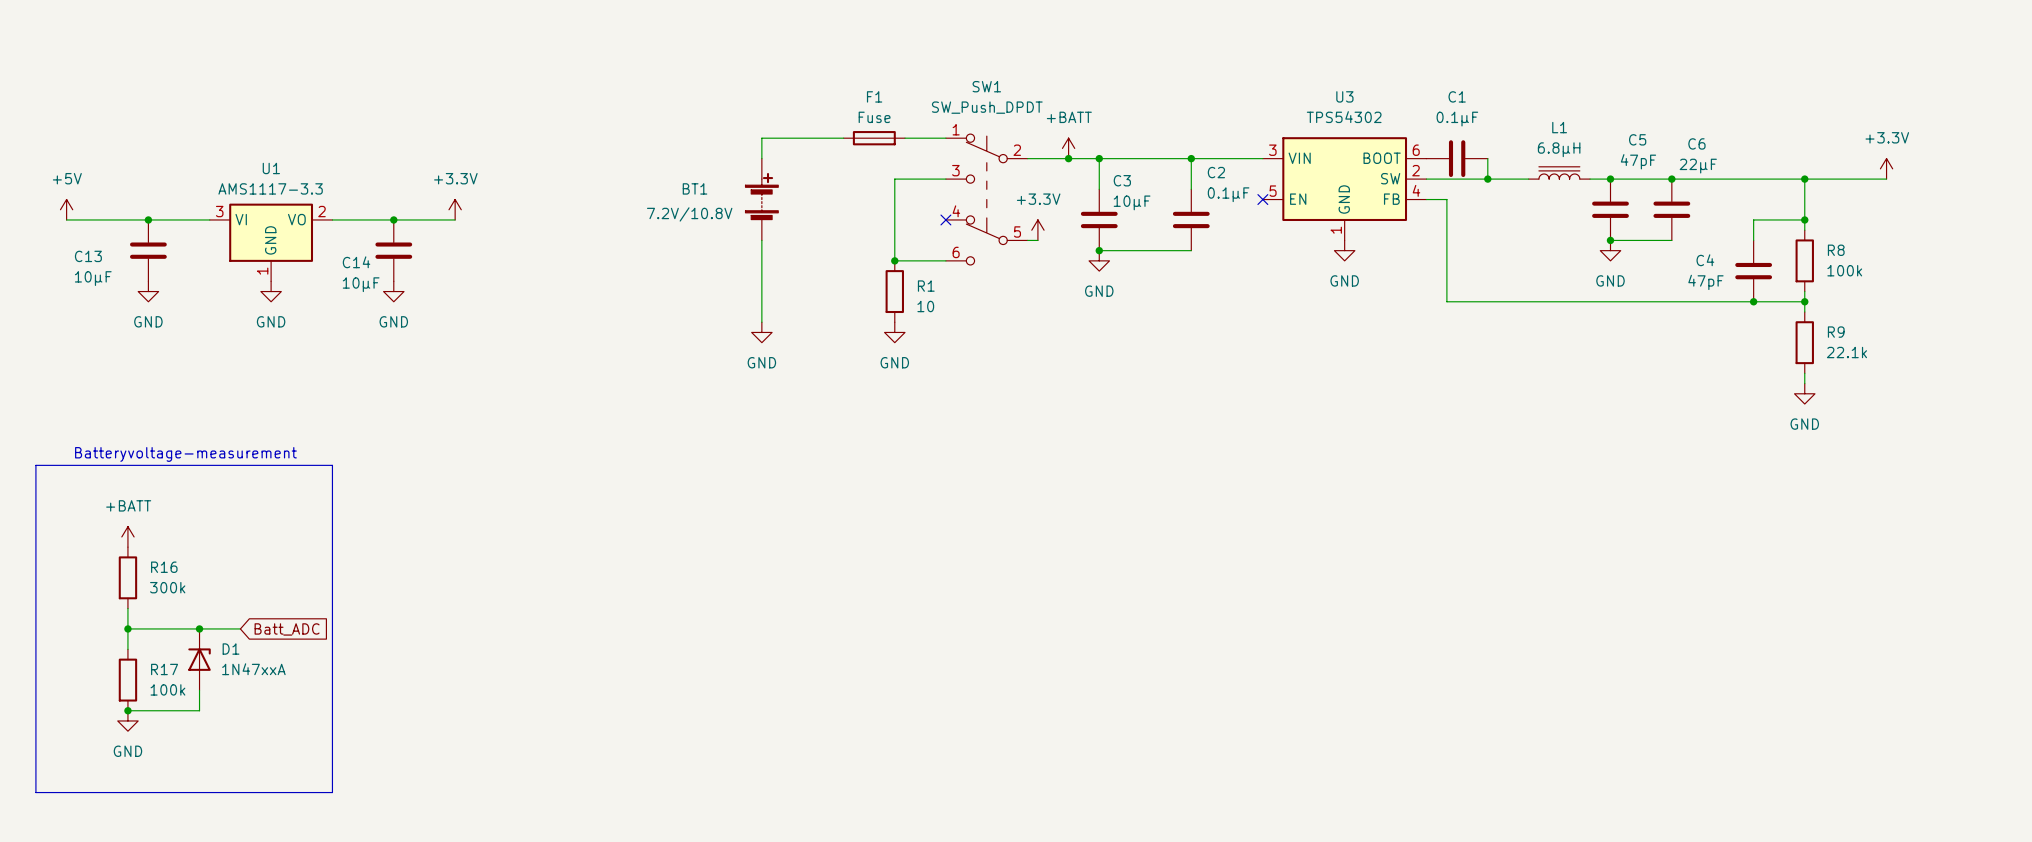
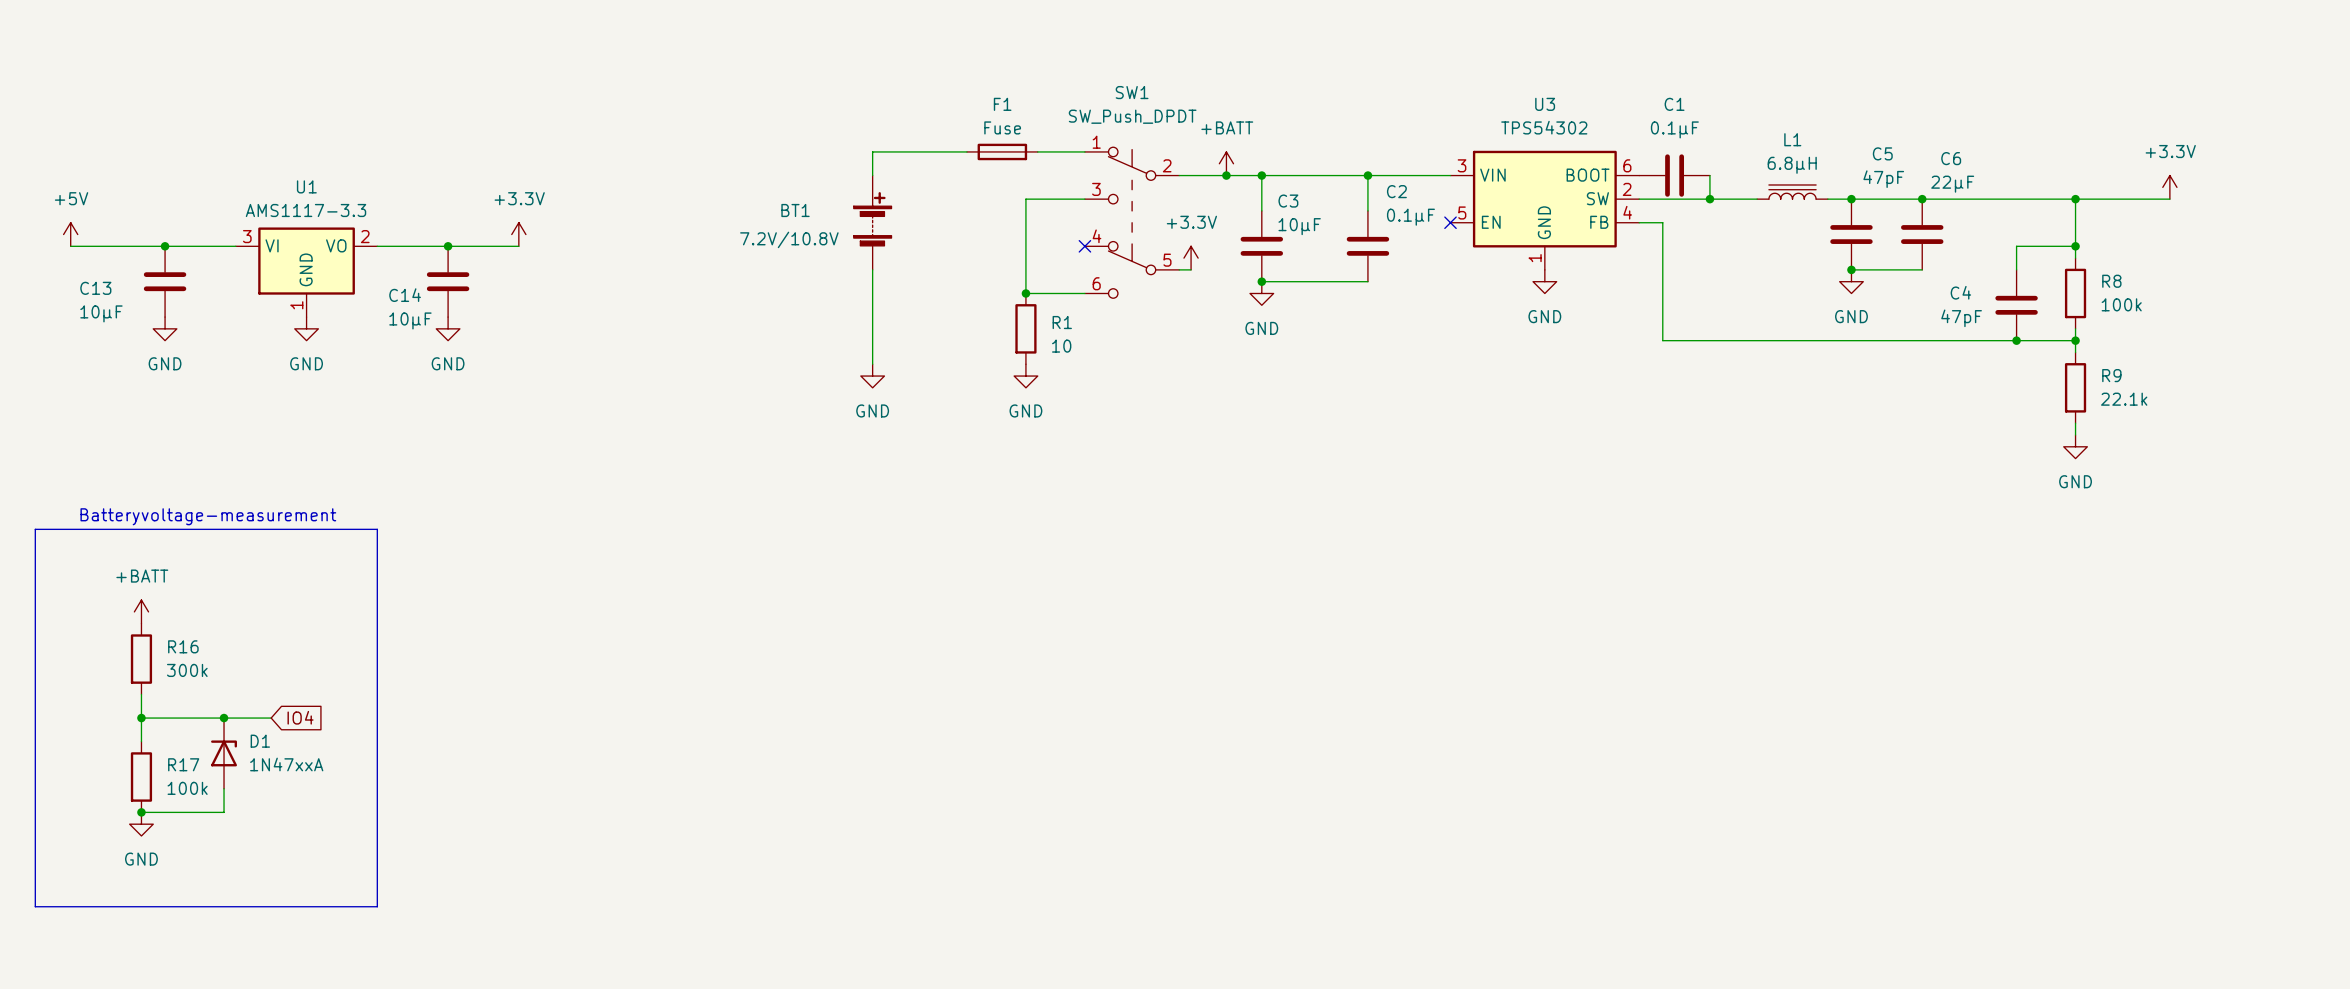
global label: Batt_ADC (287, 629) -> IO4 (300, 717)

